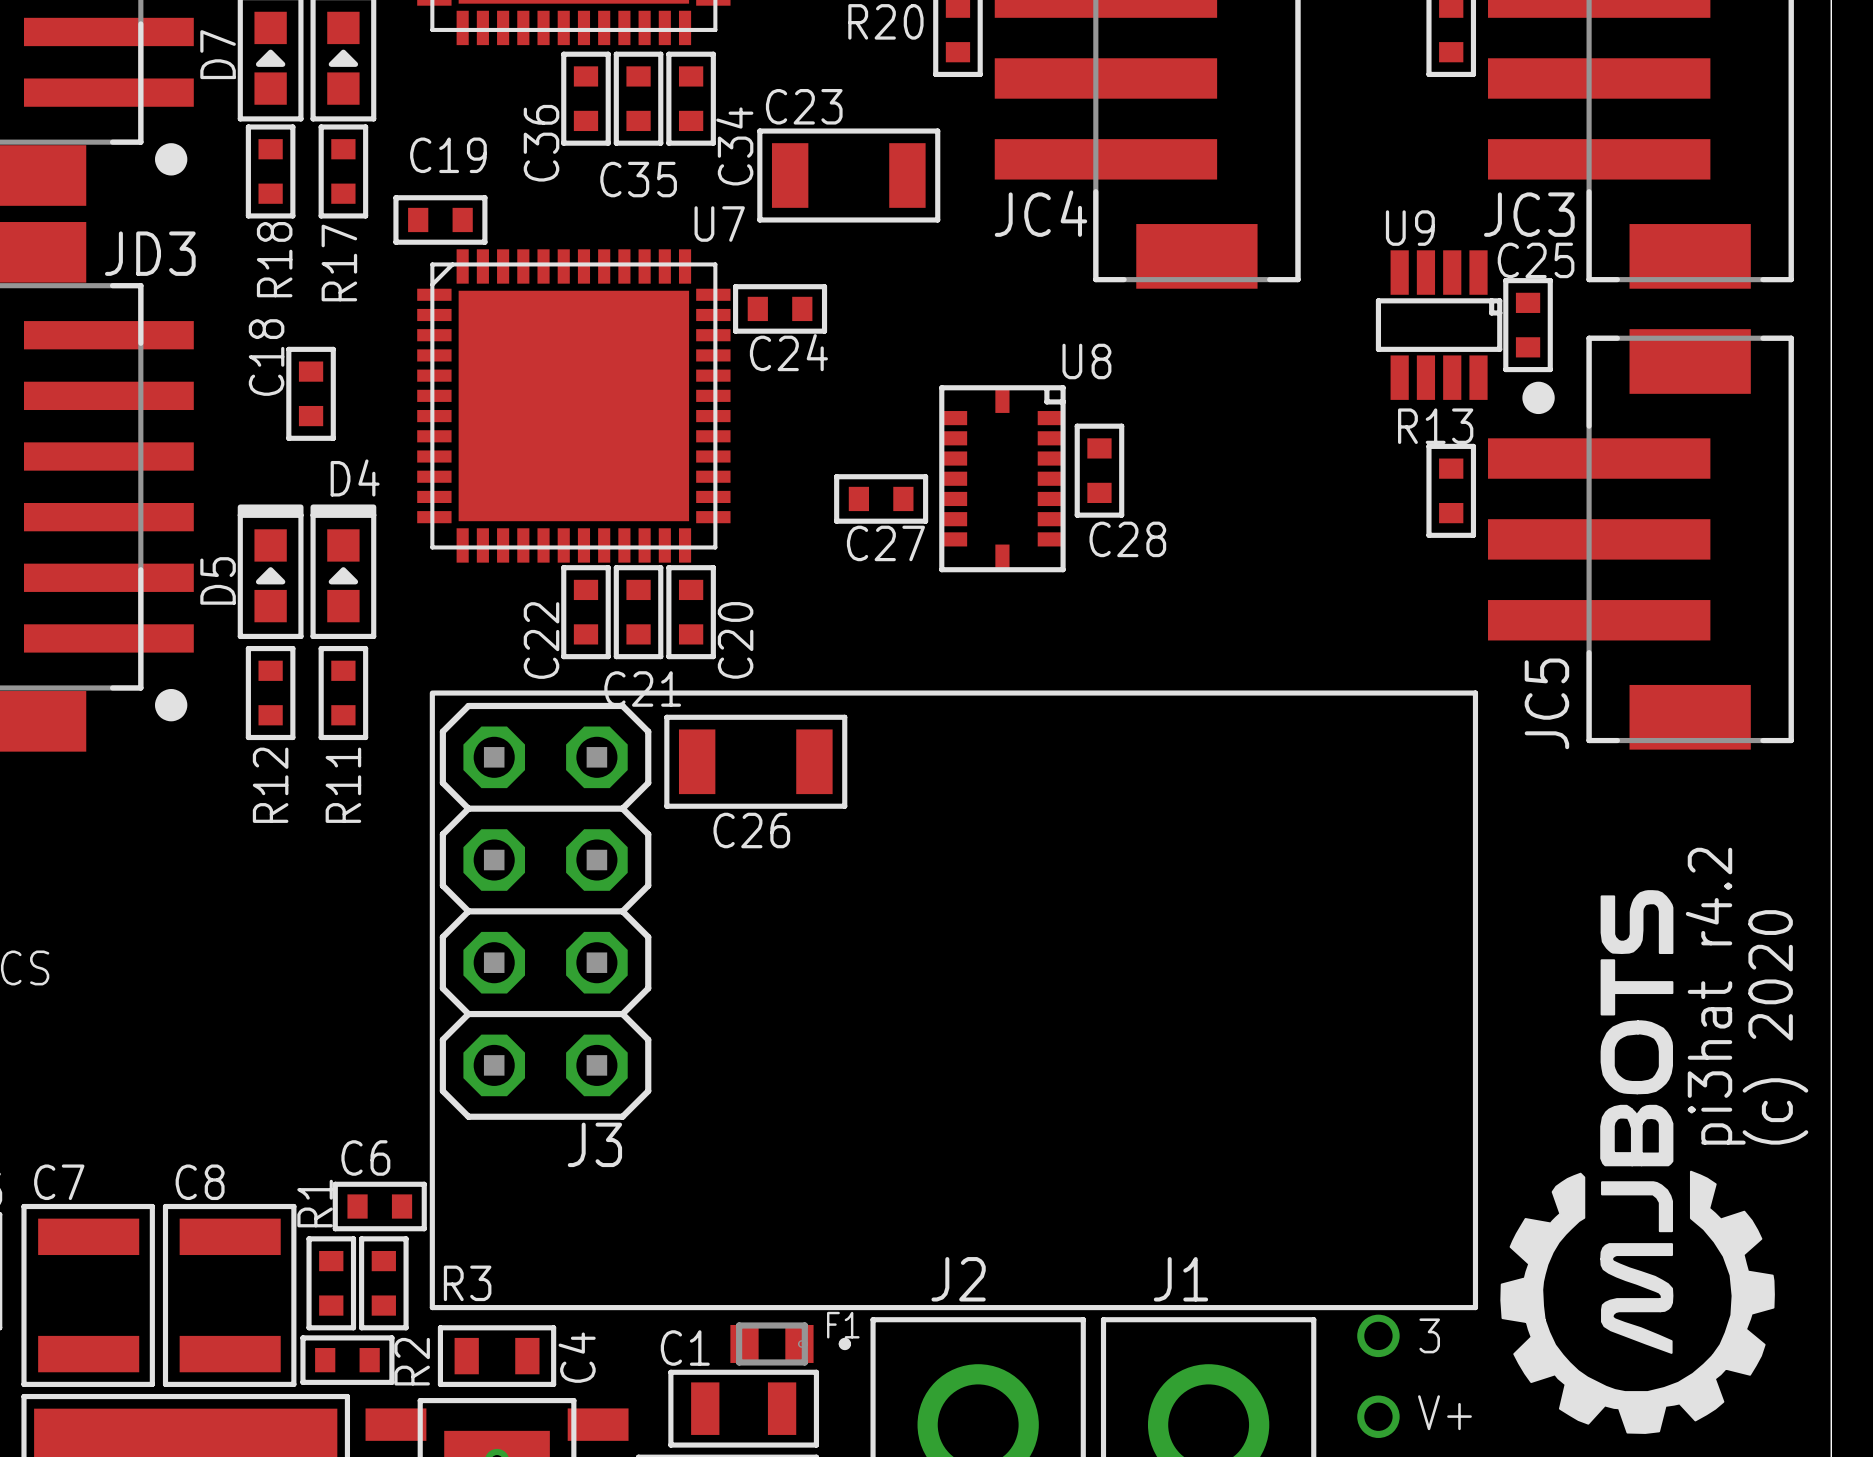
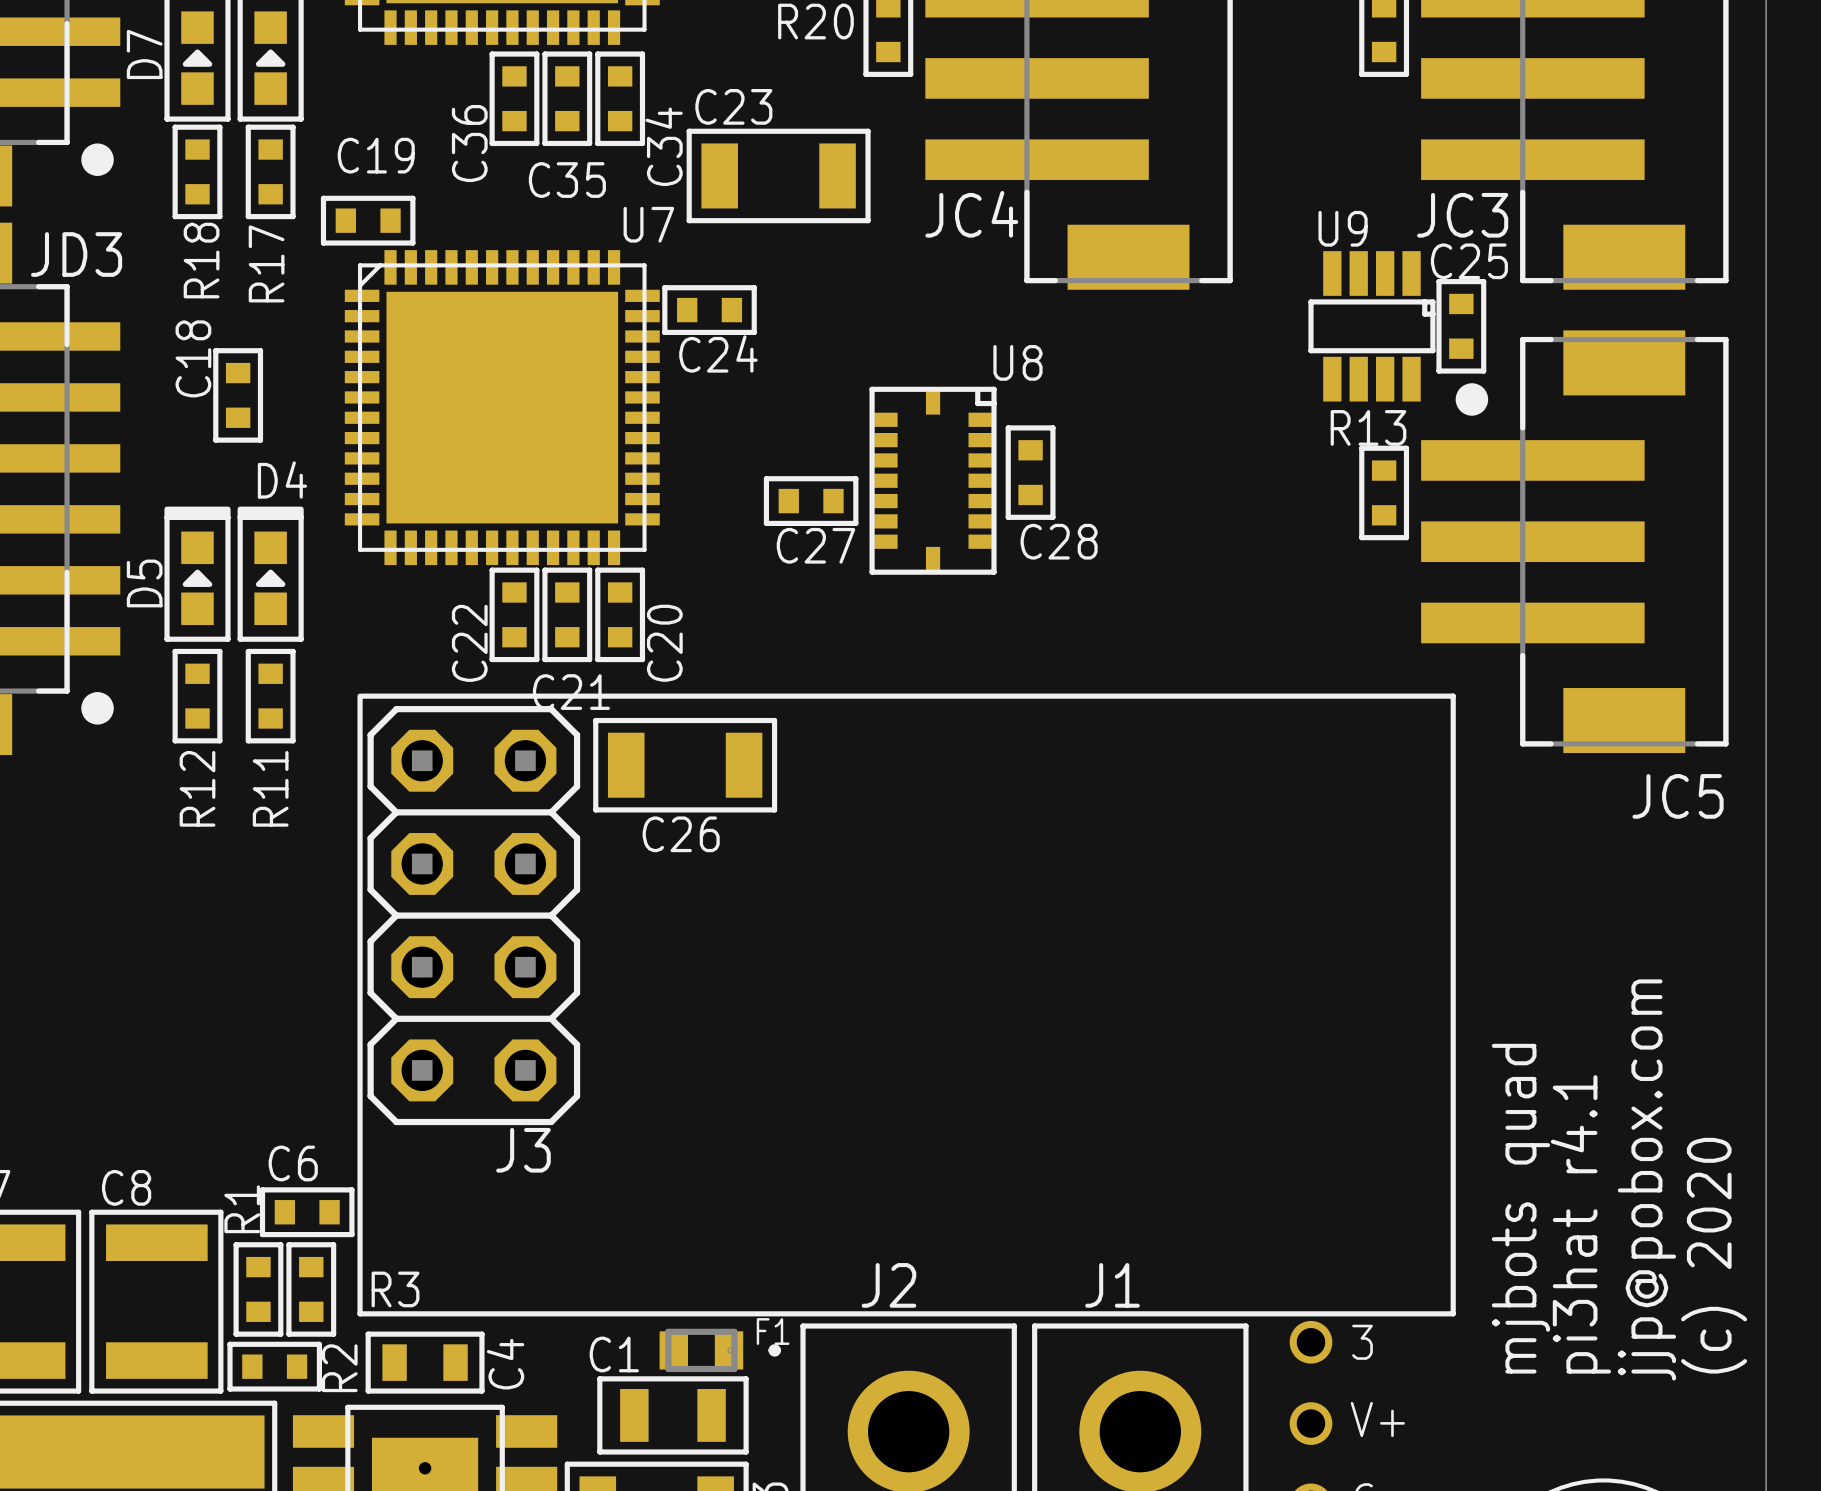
line: (1475, 693) (1475, 1307) -> (1408, 696) (1453, 696) (1453, 1313) (1408, 1313)
JC5 name rotation: 0° (1546, 703) -> 90° clockwise (1678, 796)
JC5 name position: JC5 (1546, 703) -> JC5 (1678, 796)
drawing: [1500, 890, 1775, 1434] -> none
text: pi3hat r4.2 (1715, 996) -> pi3hat r4.1 (1580, 1224)
text position: (c) 2020 (1775, 1027) -> (c) 2020 (1714, 1255)
text: none -> jjp@pobox.com (1646, 1179)
text: none -> mjbots quad (1520, 1208)

